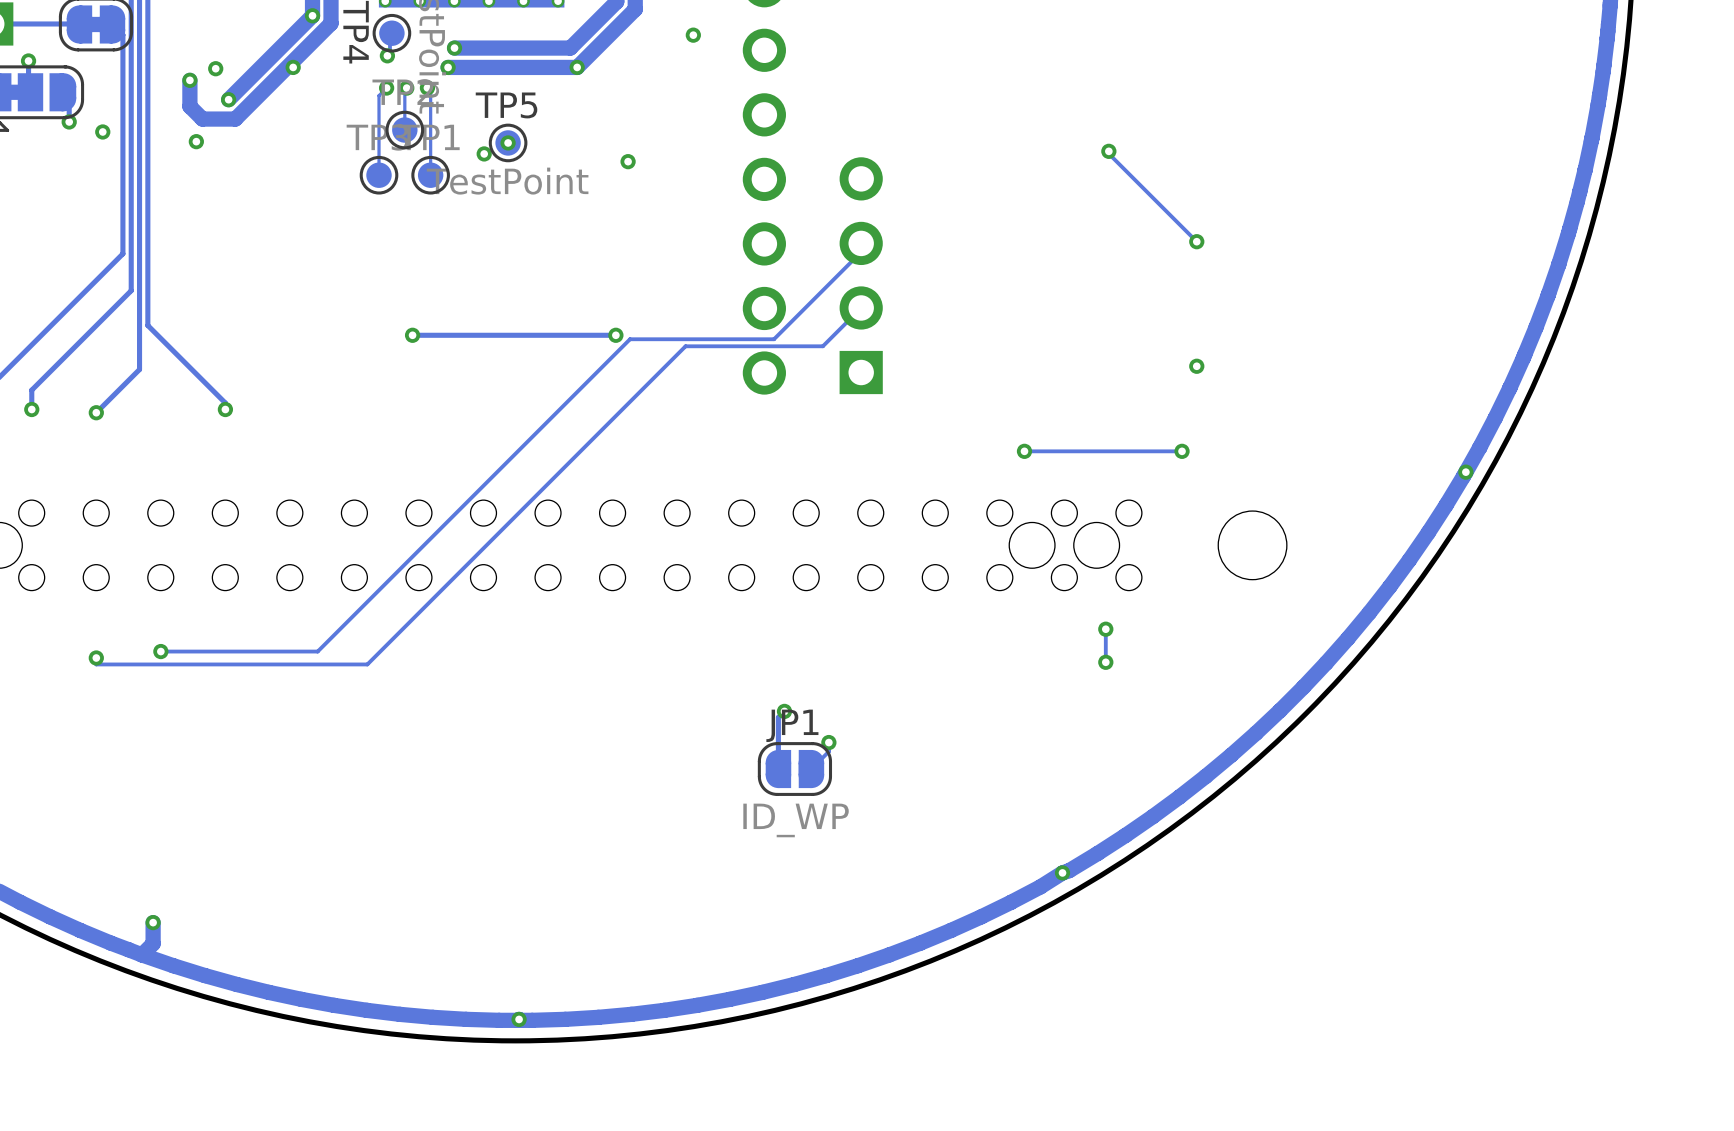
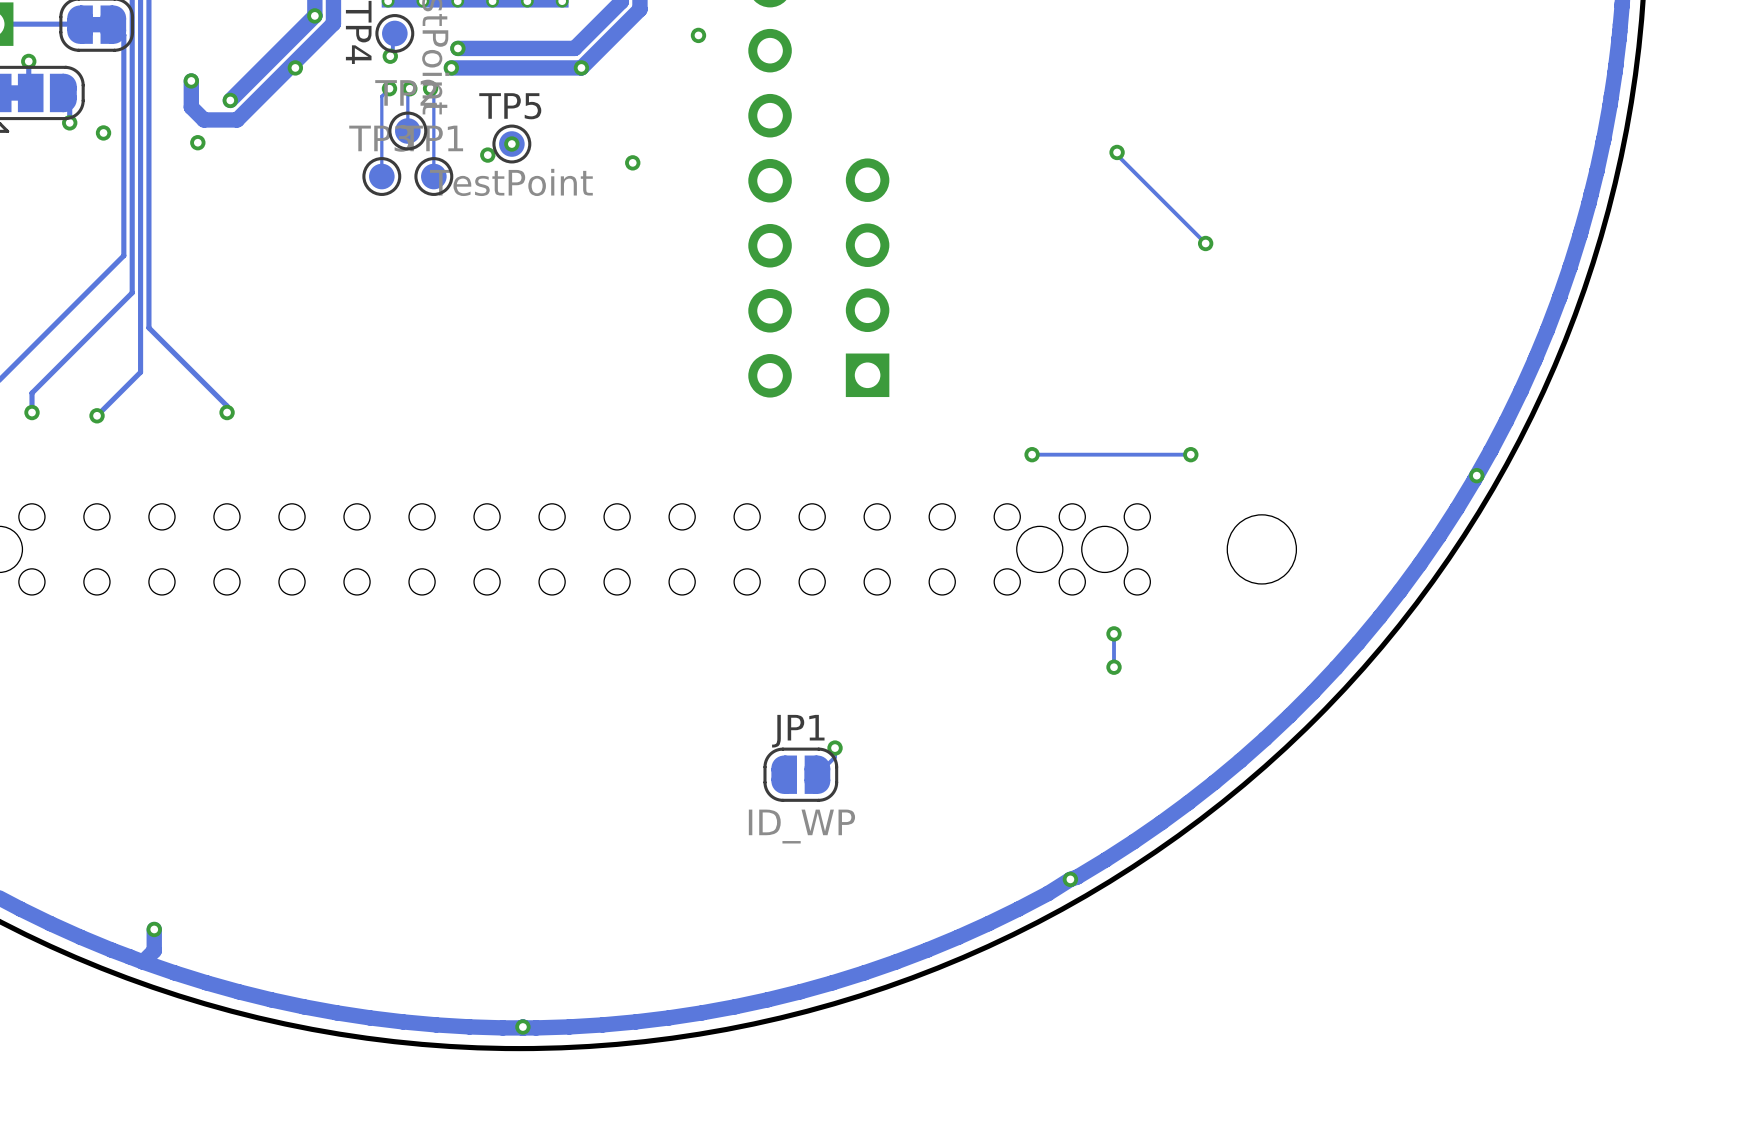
via: (215, 68) -> none
track: (861, 252) (774, 339) (630, 339) (317, 651) (160, 651) -> none
track: (861, 307) (822, 346) (685, 346) (367, 664) (96, 664) (96, 658) -> none
via: (412, 335) -> none
track: (615, 335) (412, 335) -> none
via: (615, 335) -> none
via: (1196, 366) -> none
via: (160, 651) -> none
via: (96, 658) -> none
track: (784, 711) (778, 717) (778, 769) -> none
via: (784, 711) -> none

